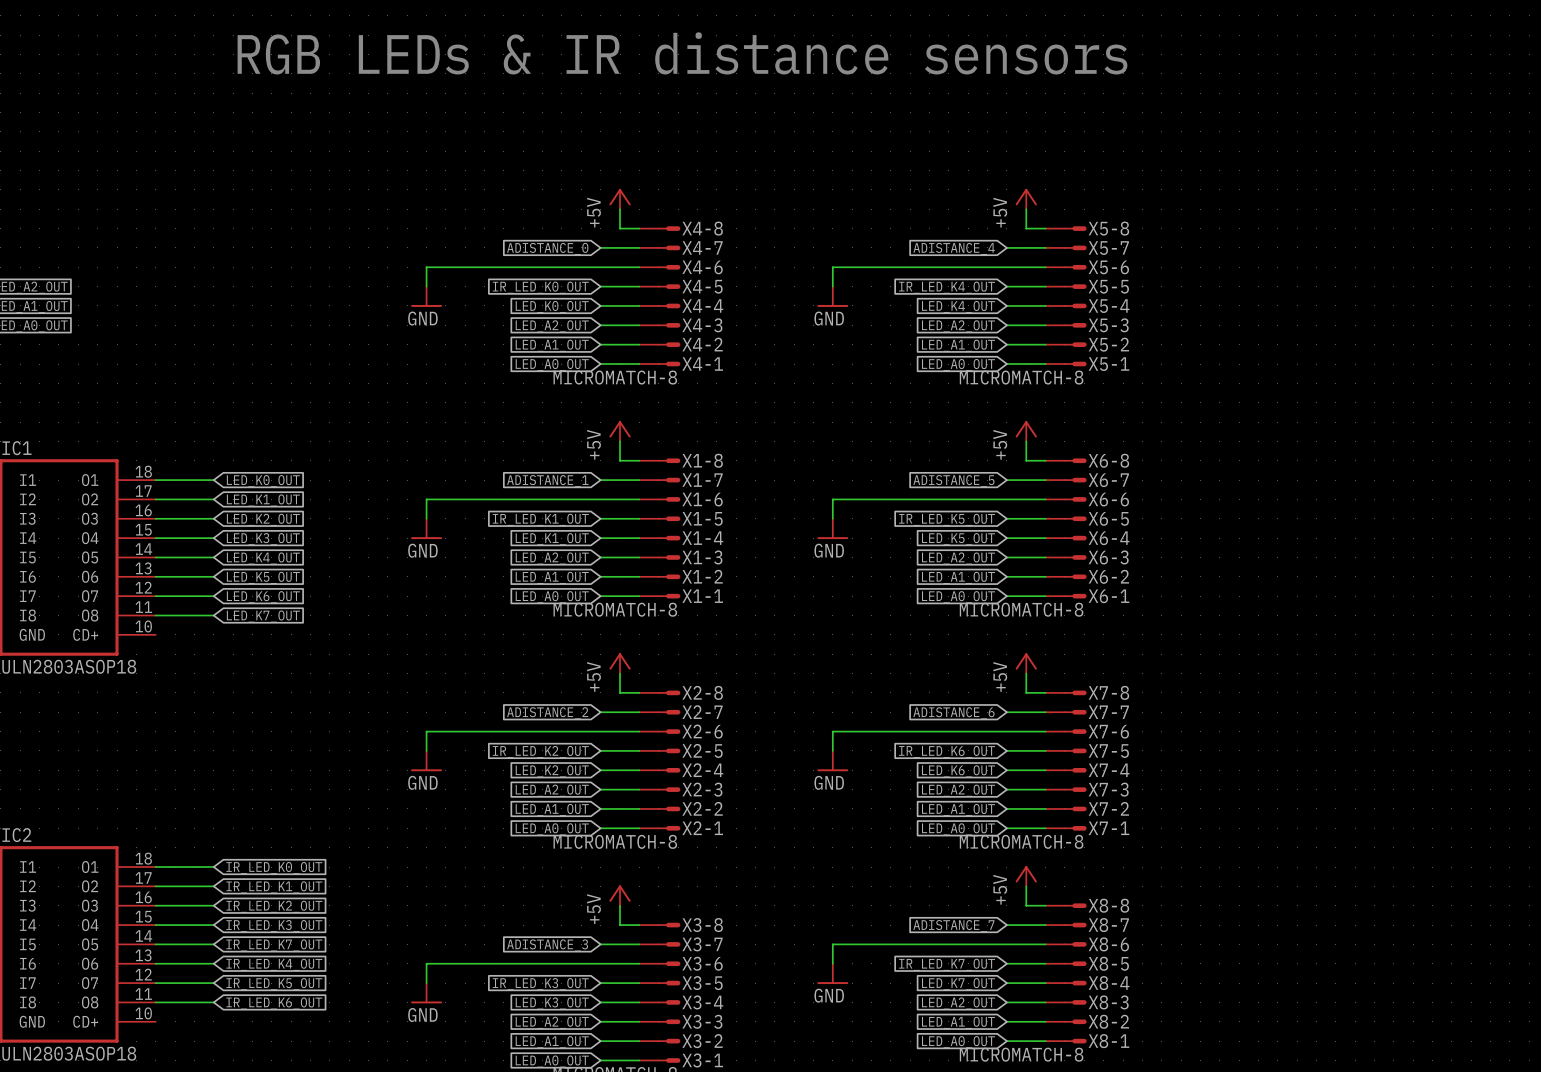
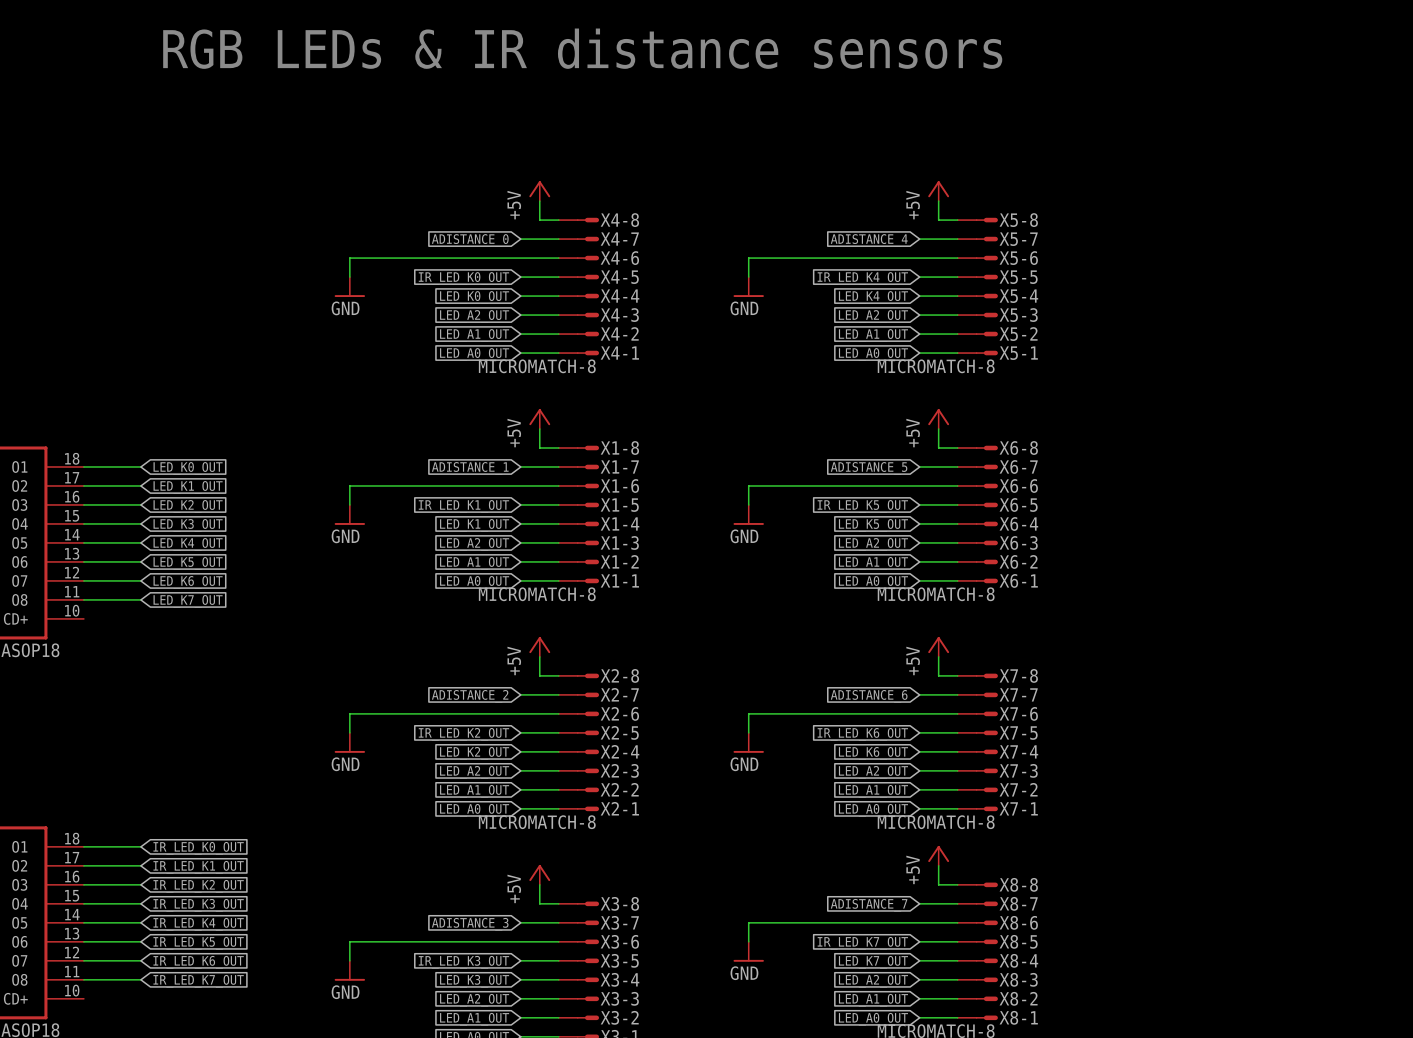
global label: IR_LED_K7_OUT (274, 945) -> IR_LED_K4_OUT (198, 924)
global label: IR_LED_K4_OUT (274, 964) -> IR_LED_K5_OUT (198, 943)
global label: IR_LED_K5_OUT (274, 984) -> IR_LED_K6_OUT (198, 962)
global label: IR_LED_K6_OUT (274, 1003) -> IR_LED_K7_OUT (198, 981)

